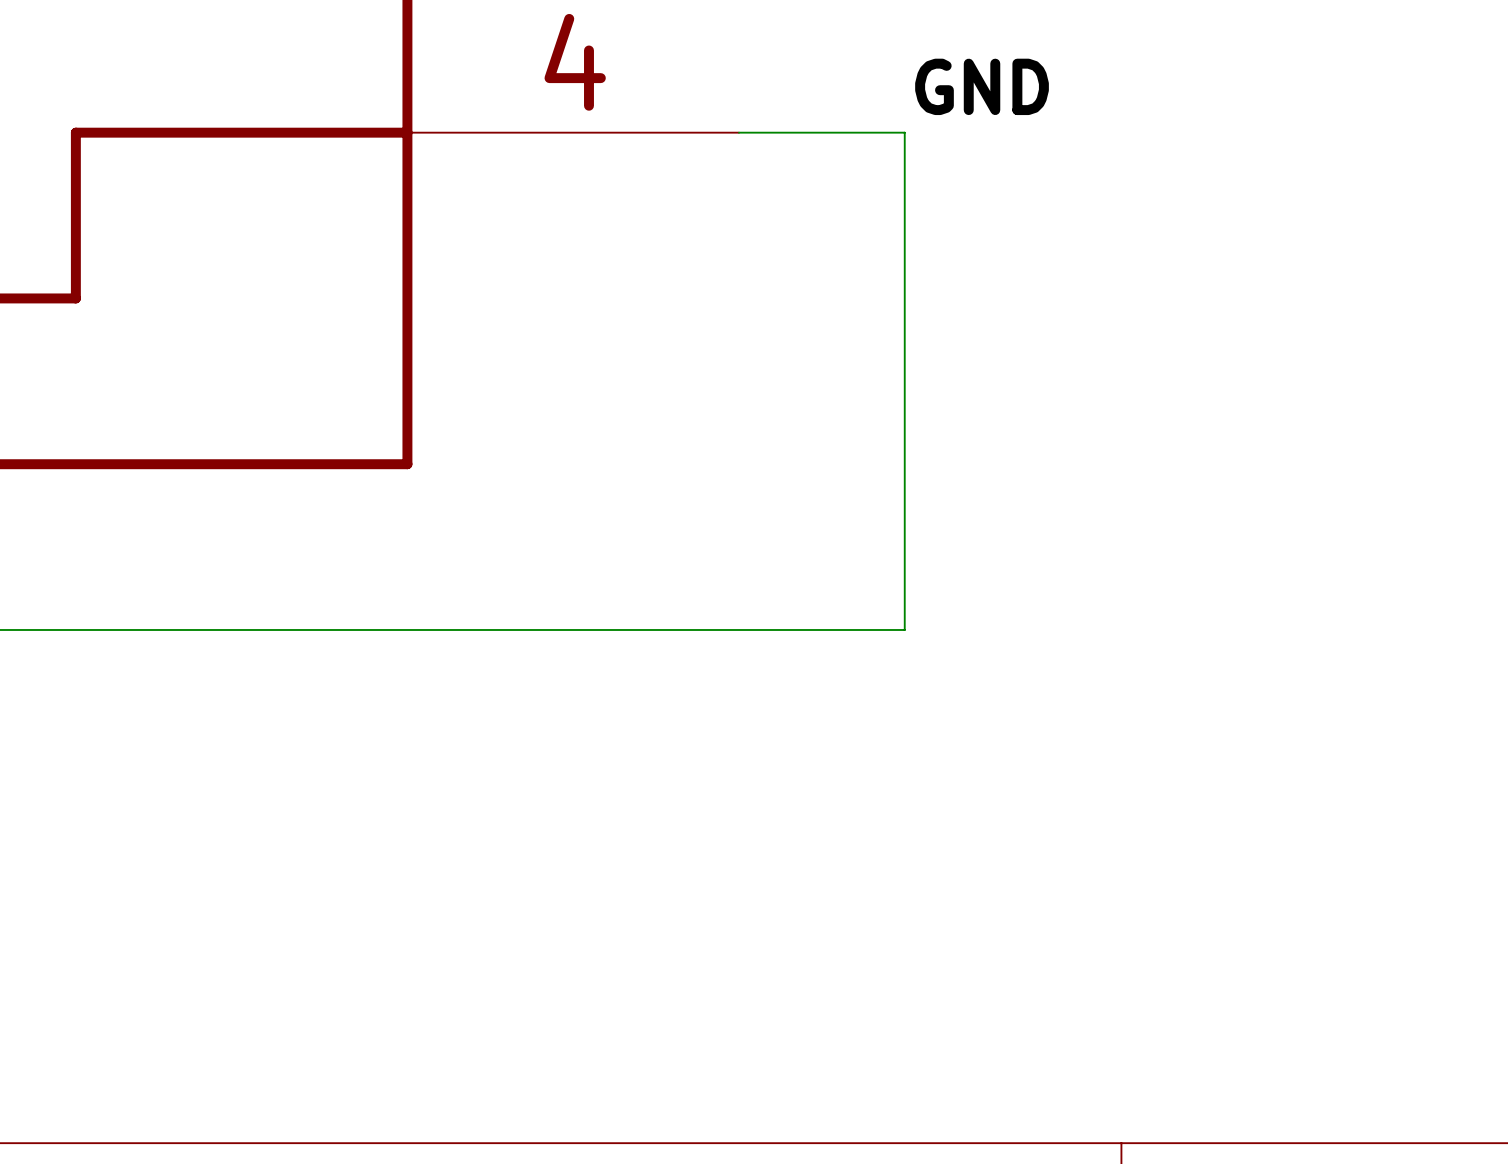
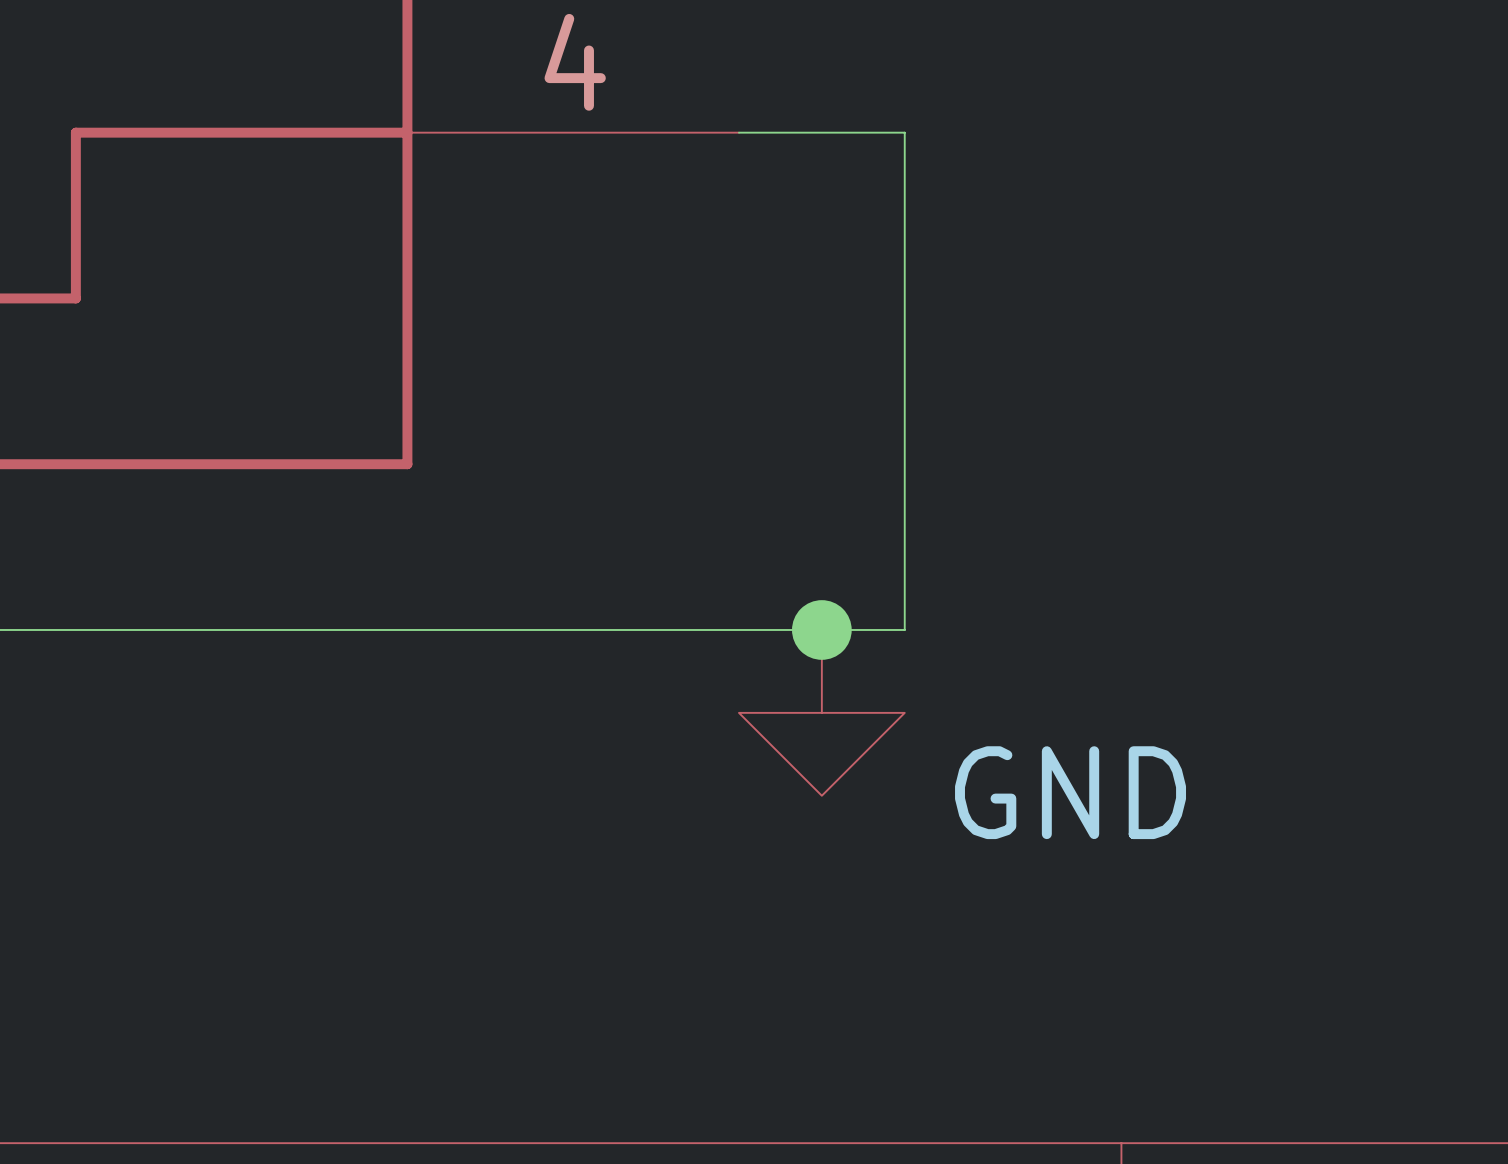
label: GND (982, 86) -> none
junction: none -> (821, 629)
power symbol: none -> GND (821, 712)

